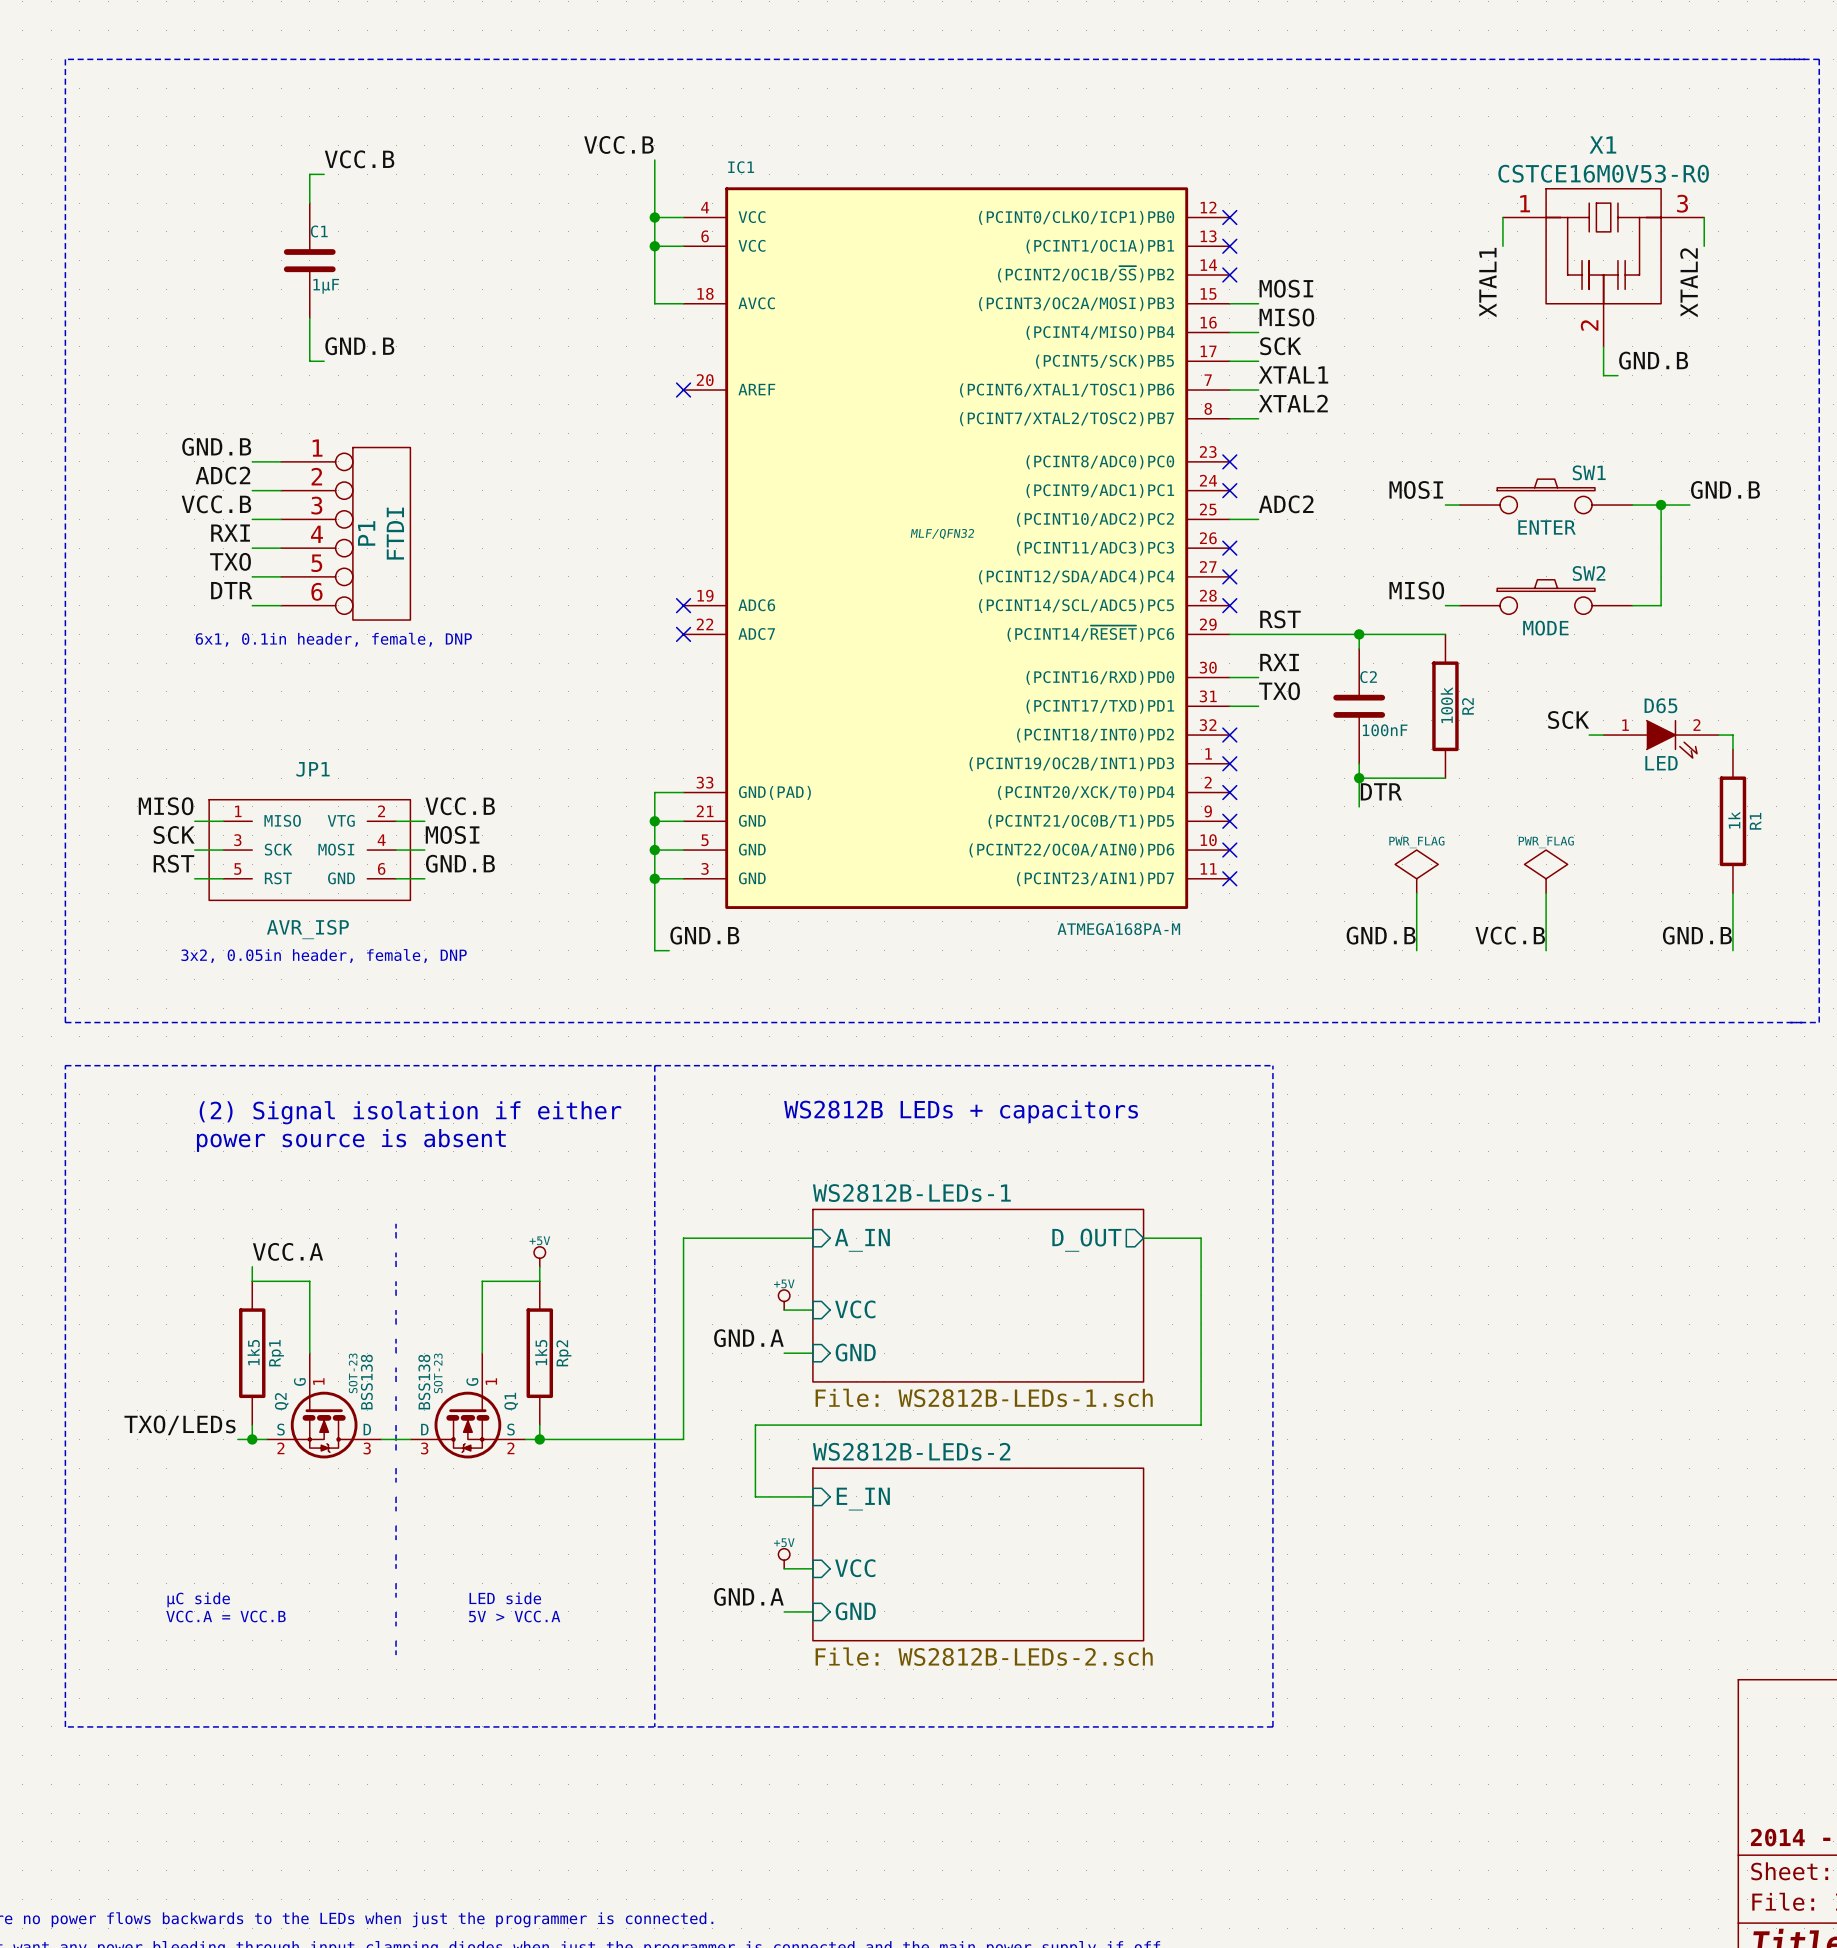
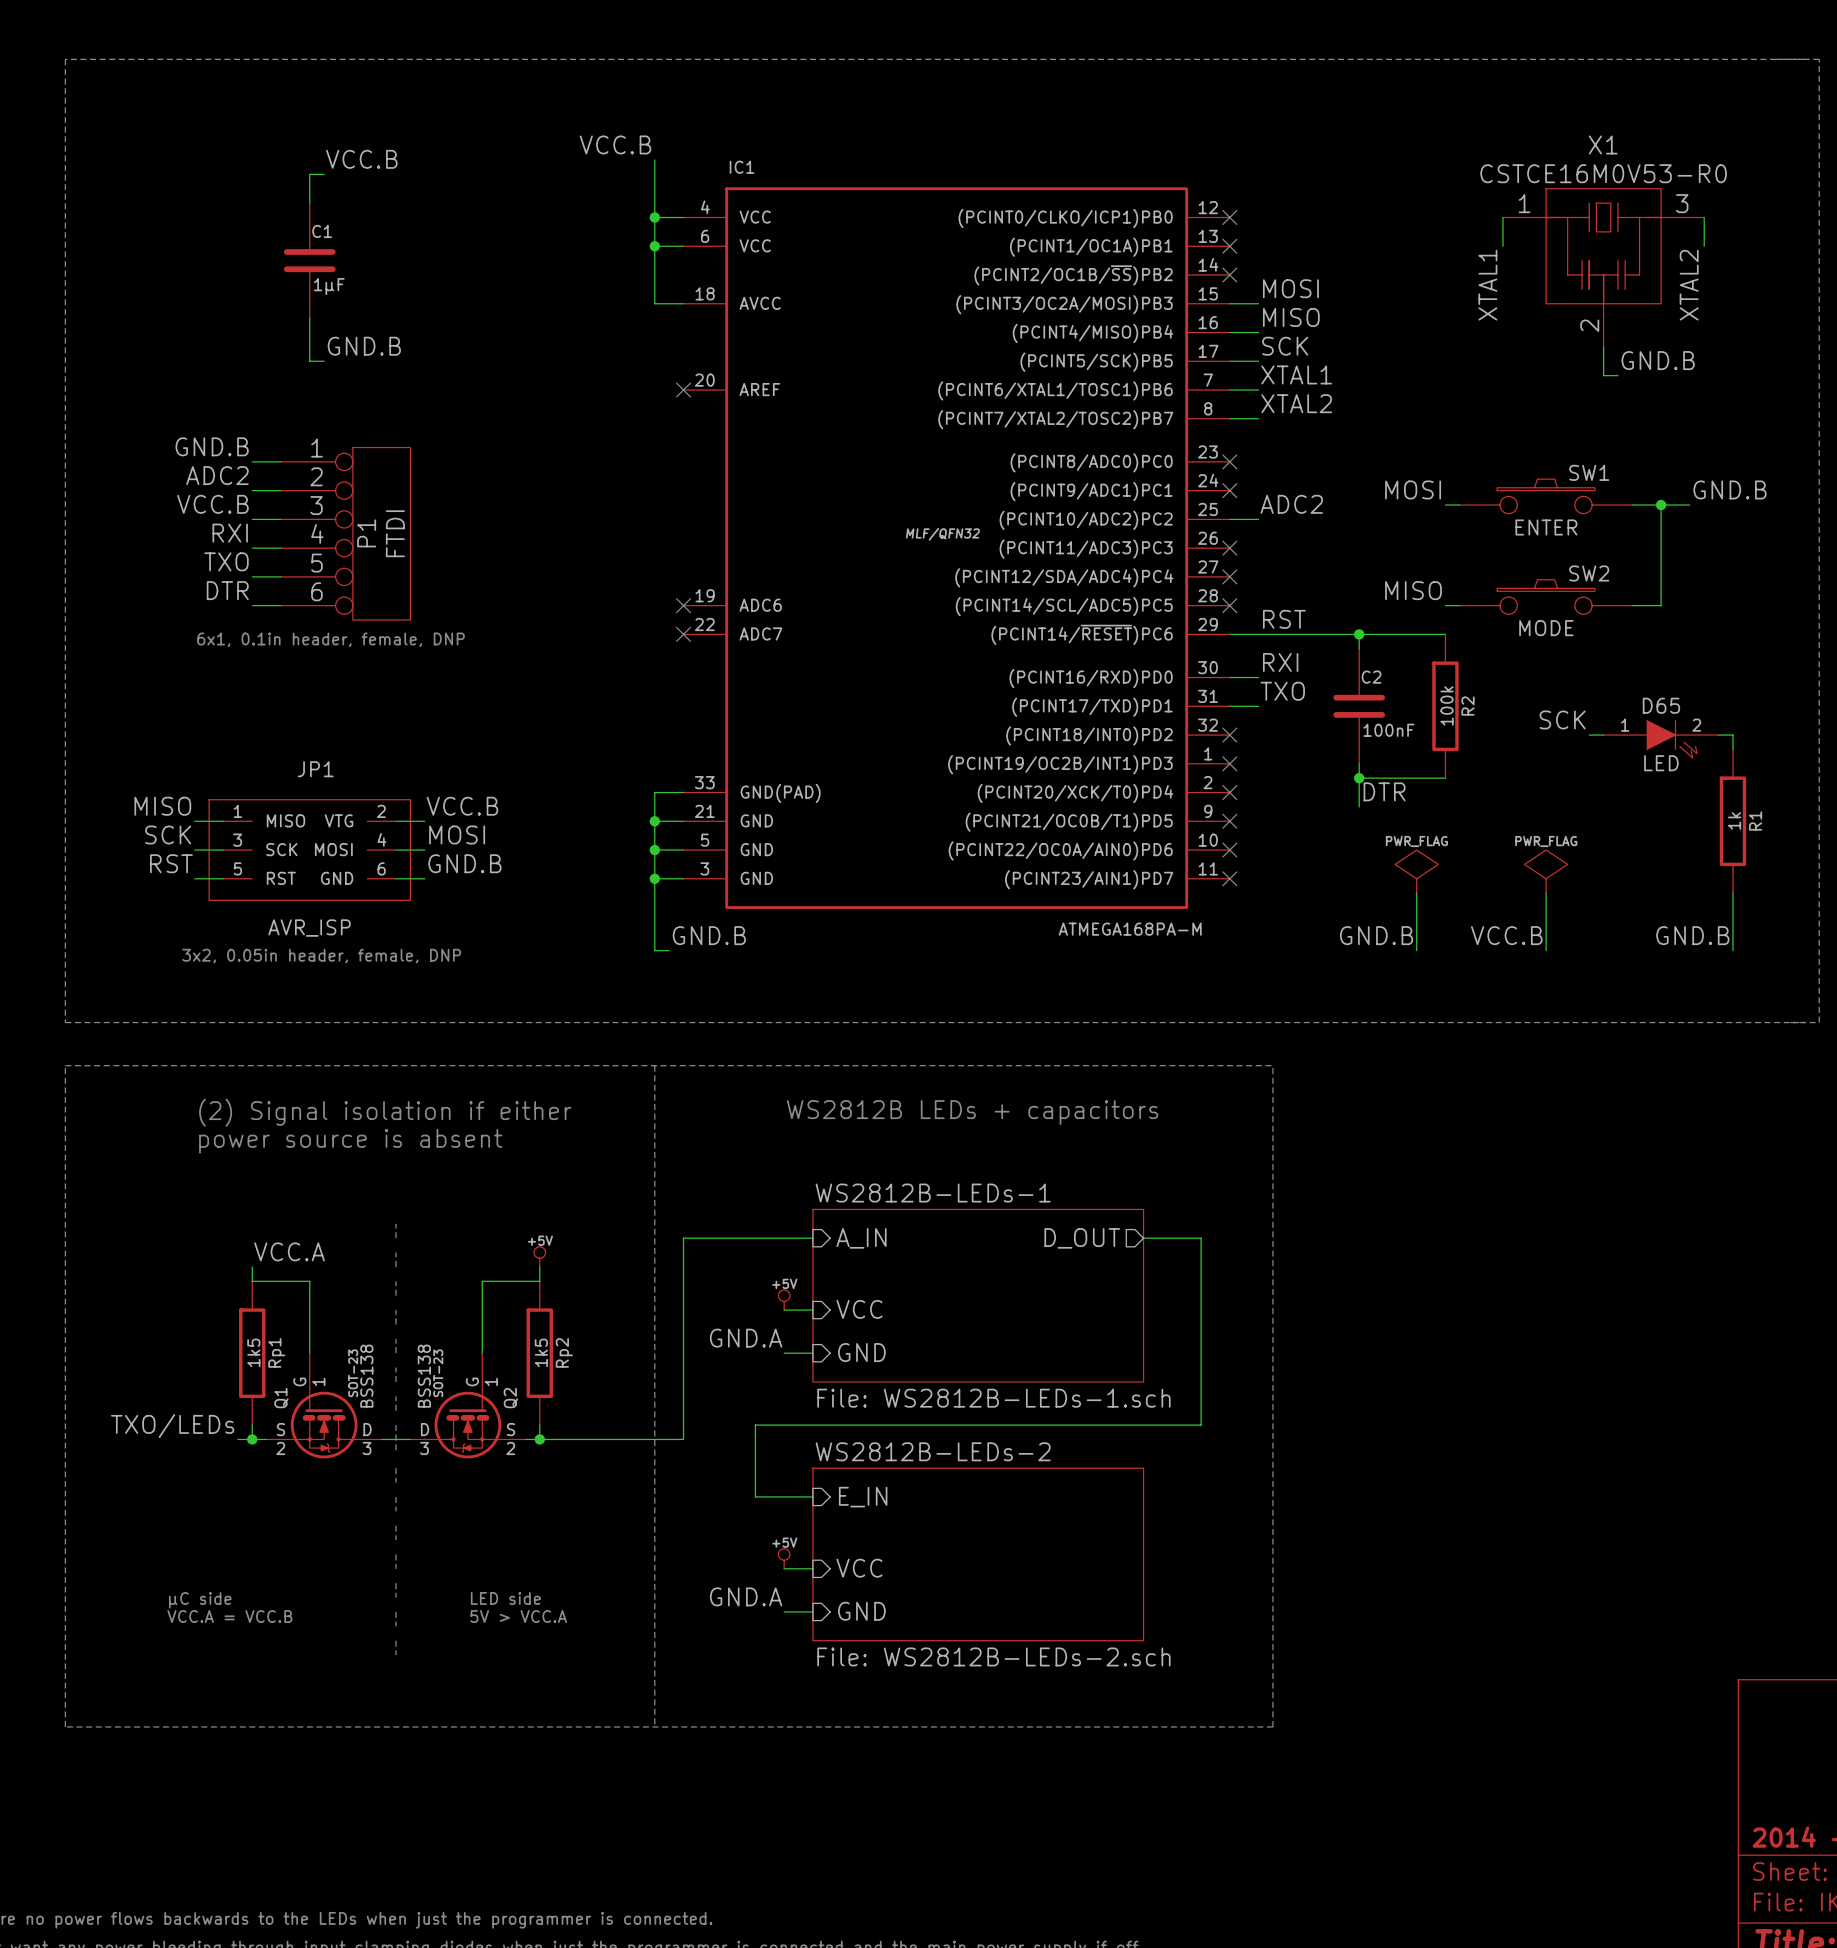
Q2 name: Q2 (281, 1401) -> Q1 (281, 1398)
Q1 name: Q1 (511, 1401) -> Q2 (510, 1398)

